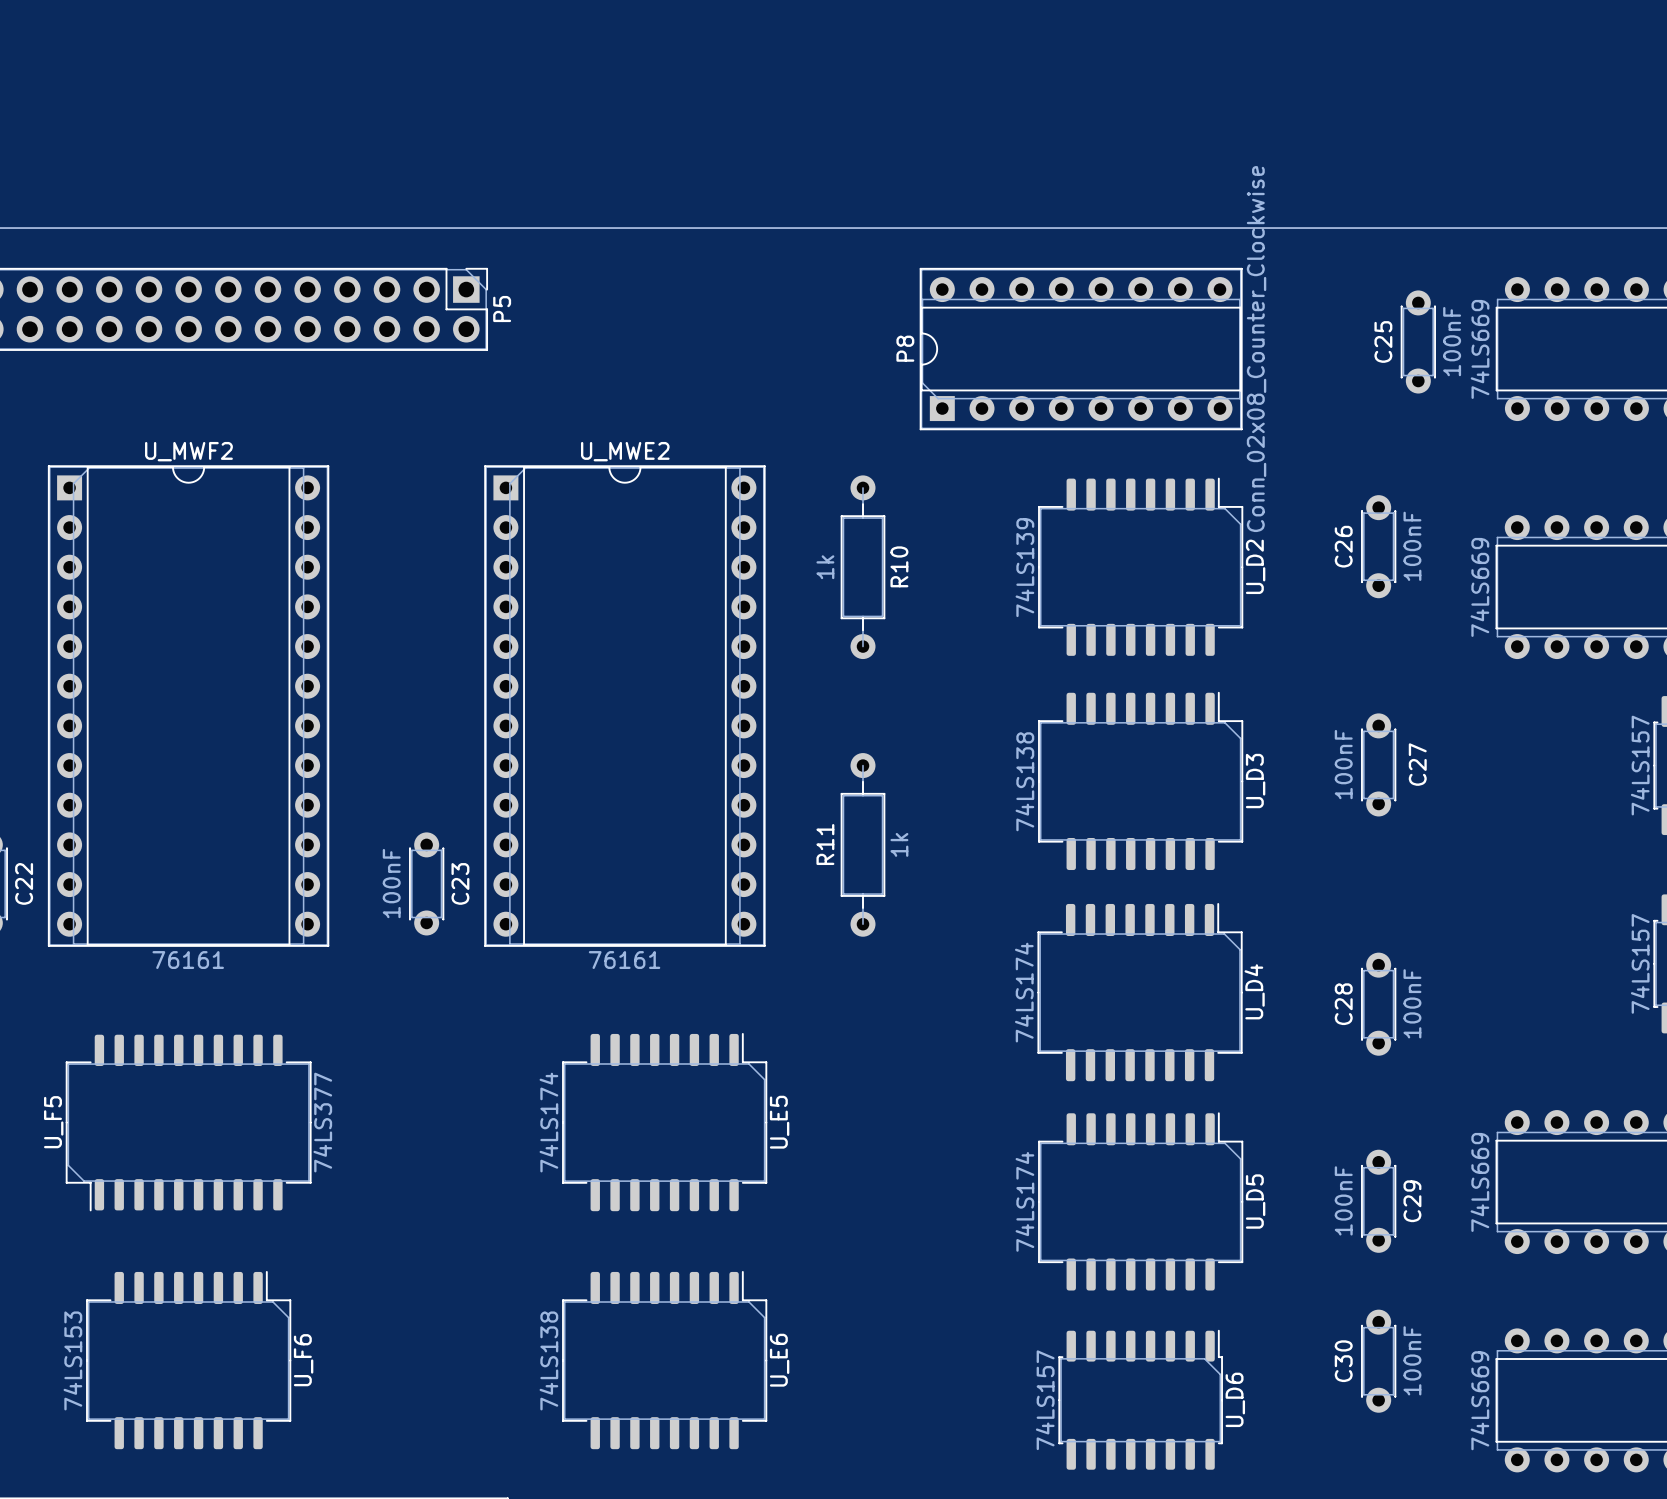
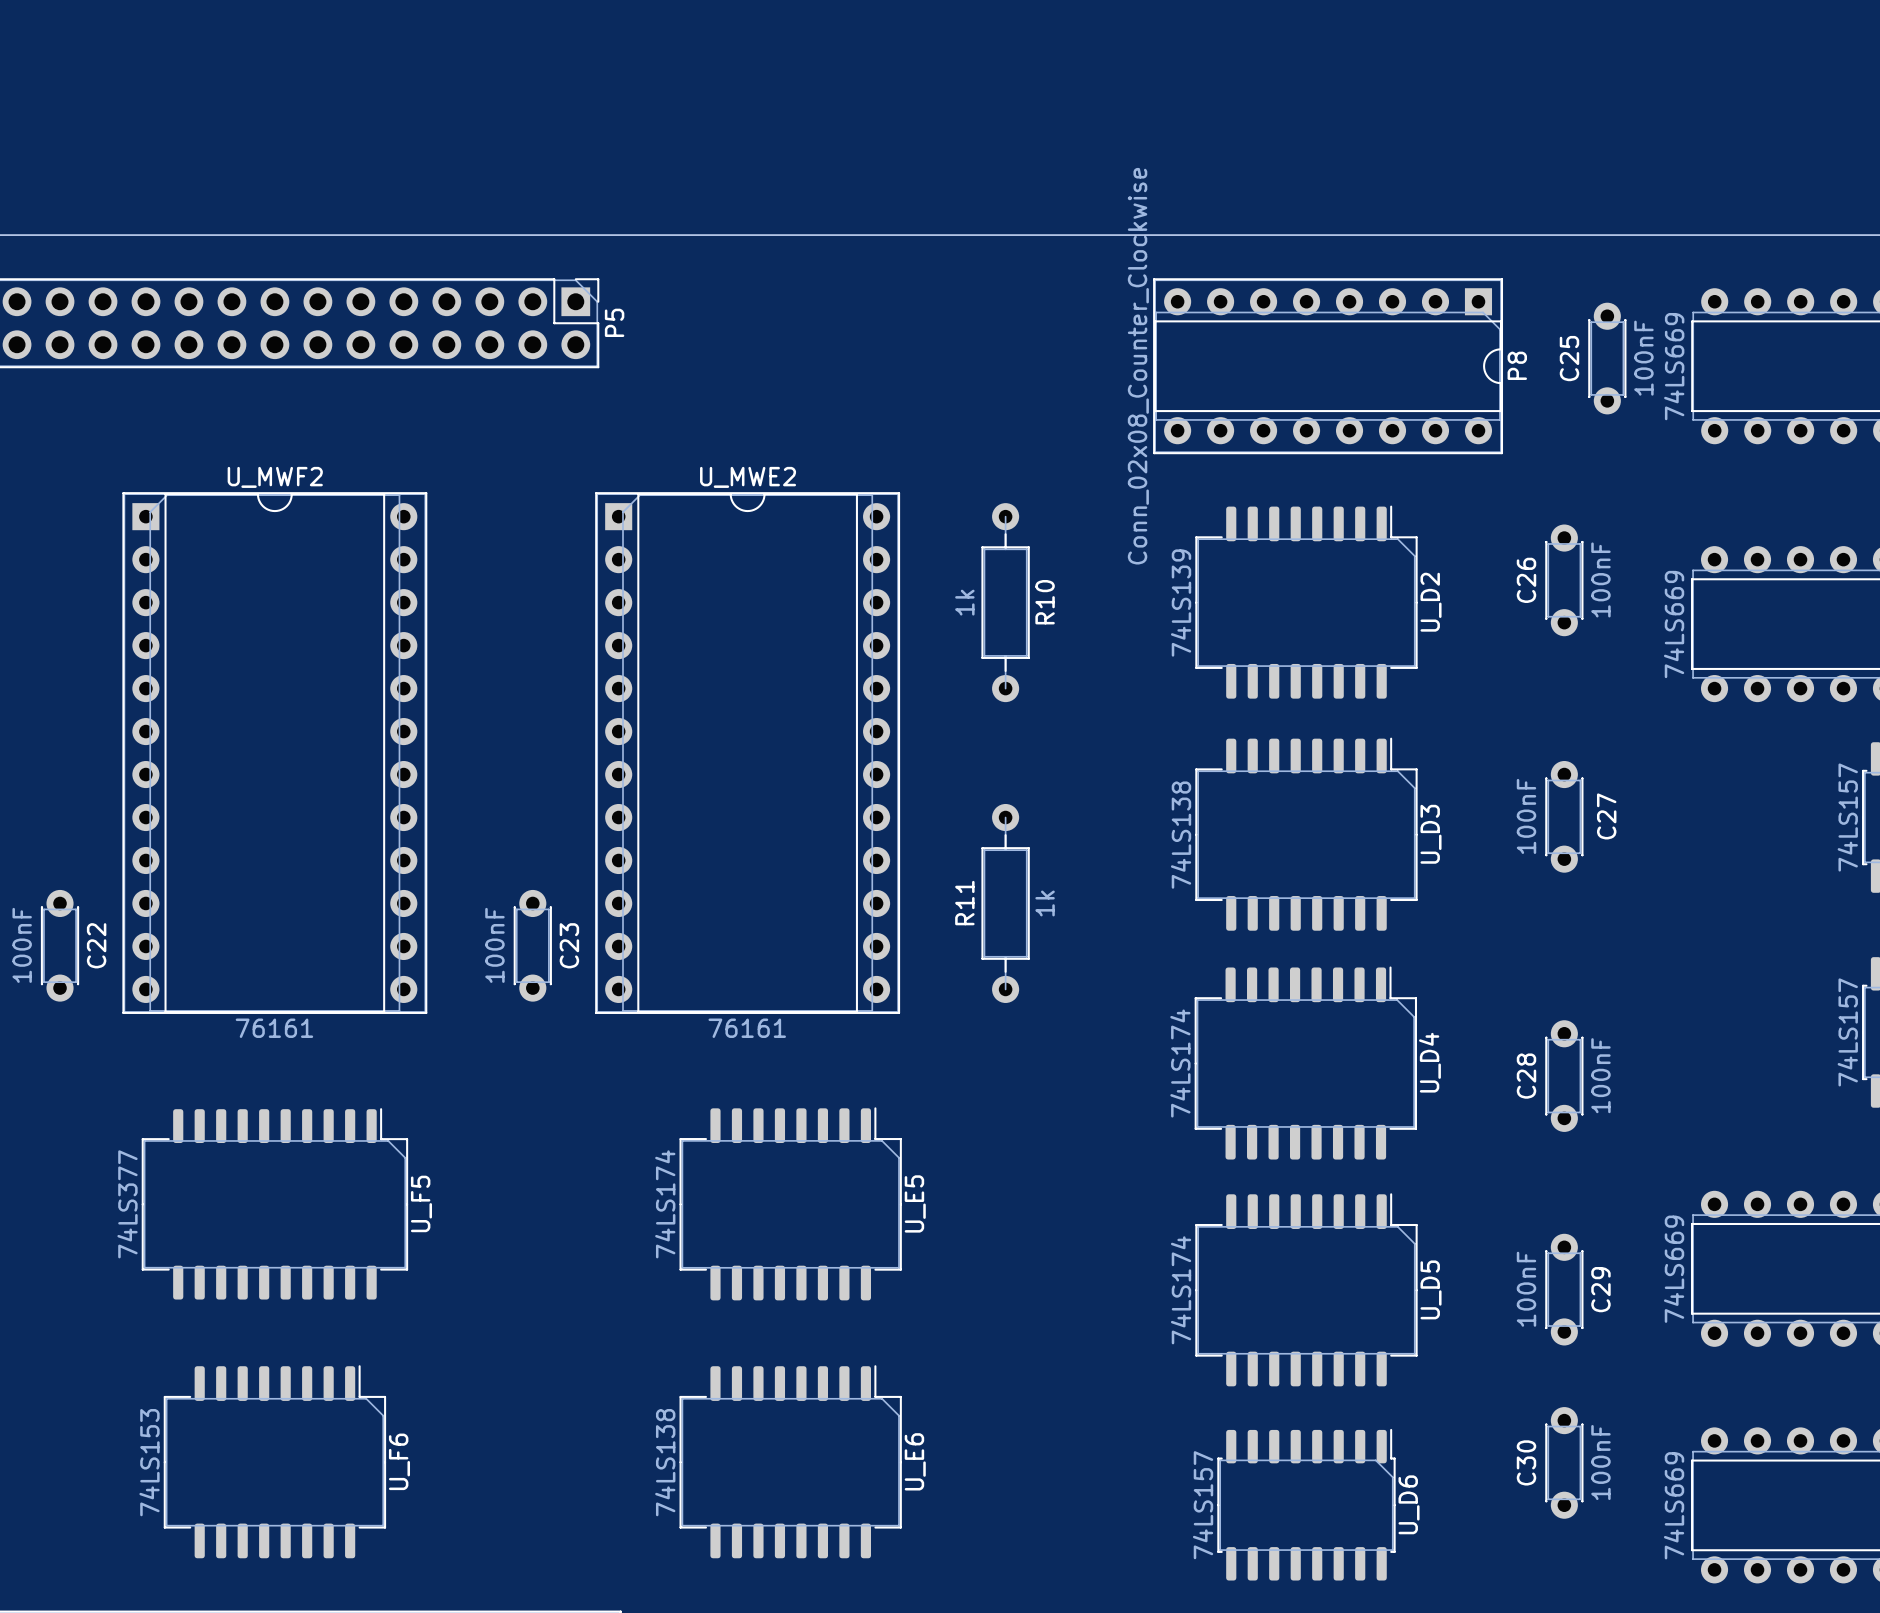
P8 rotation: 0° (1081, 349) -> 180° (1328, 366)
U_F5 rotation: 0° (188, 1123) -> 180° (274, 1203)

